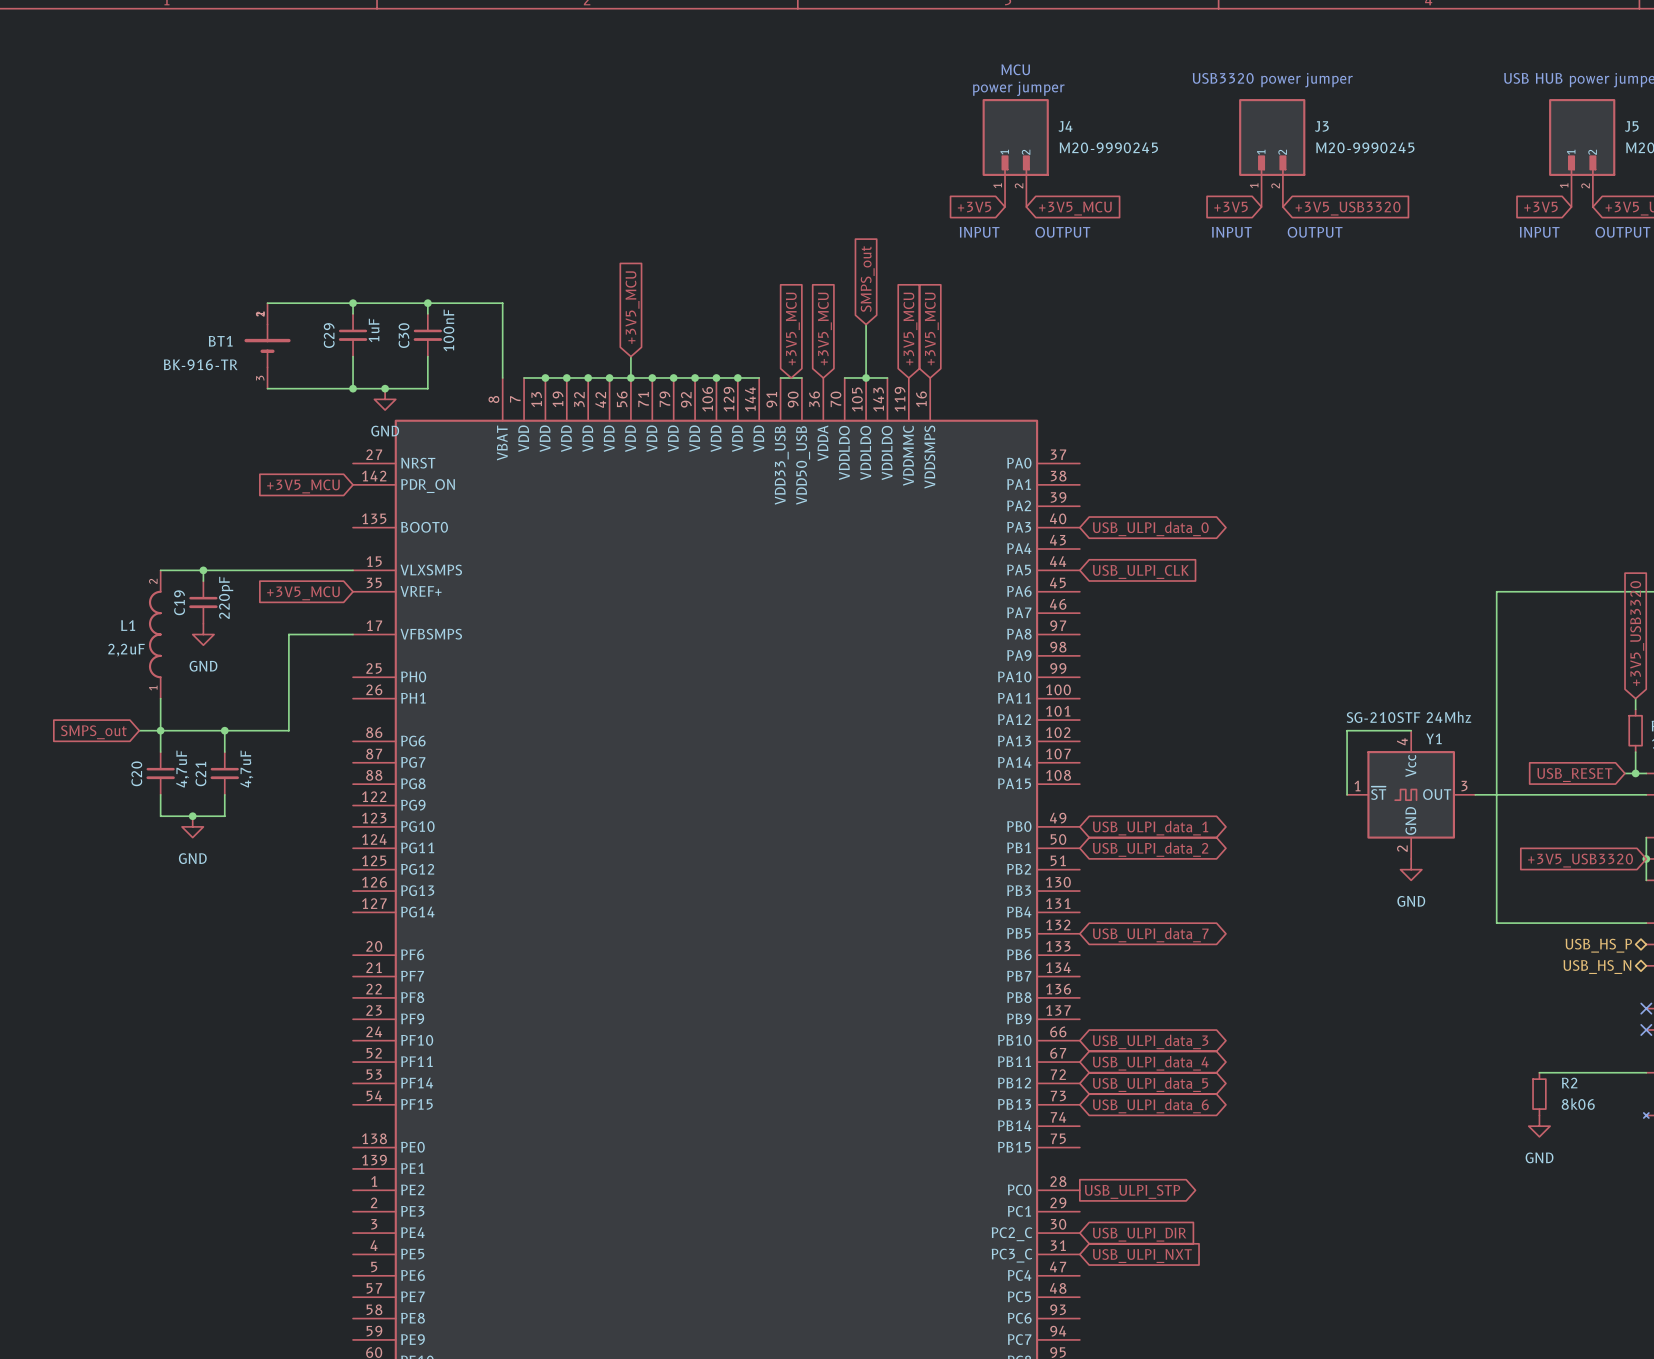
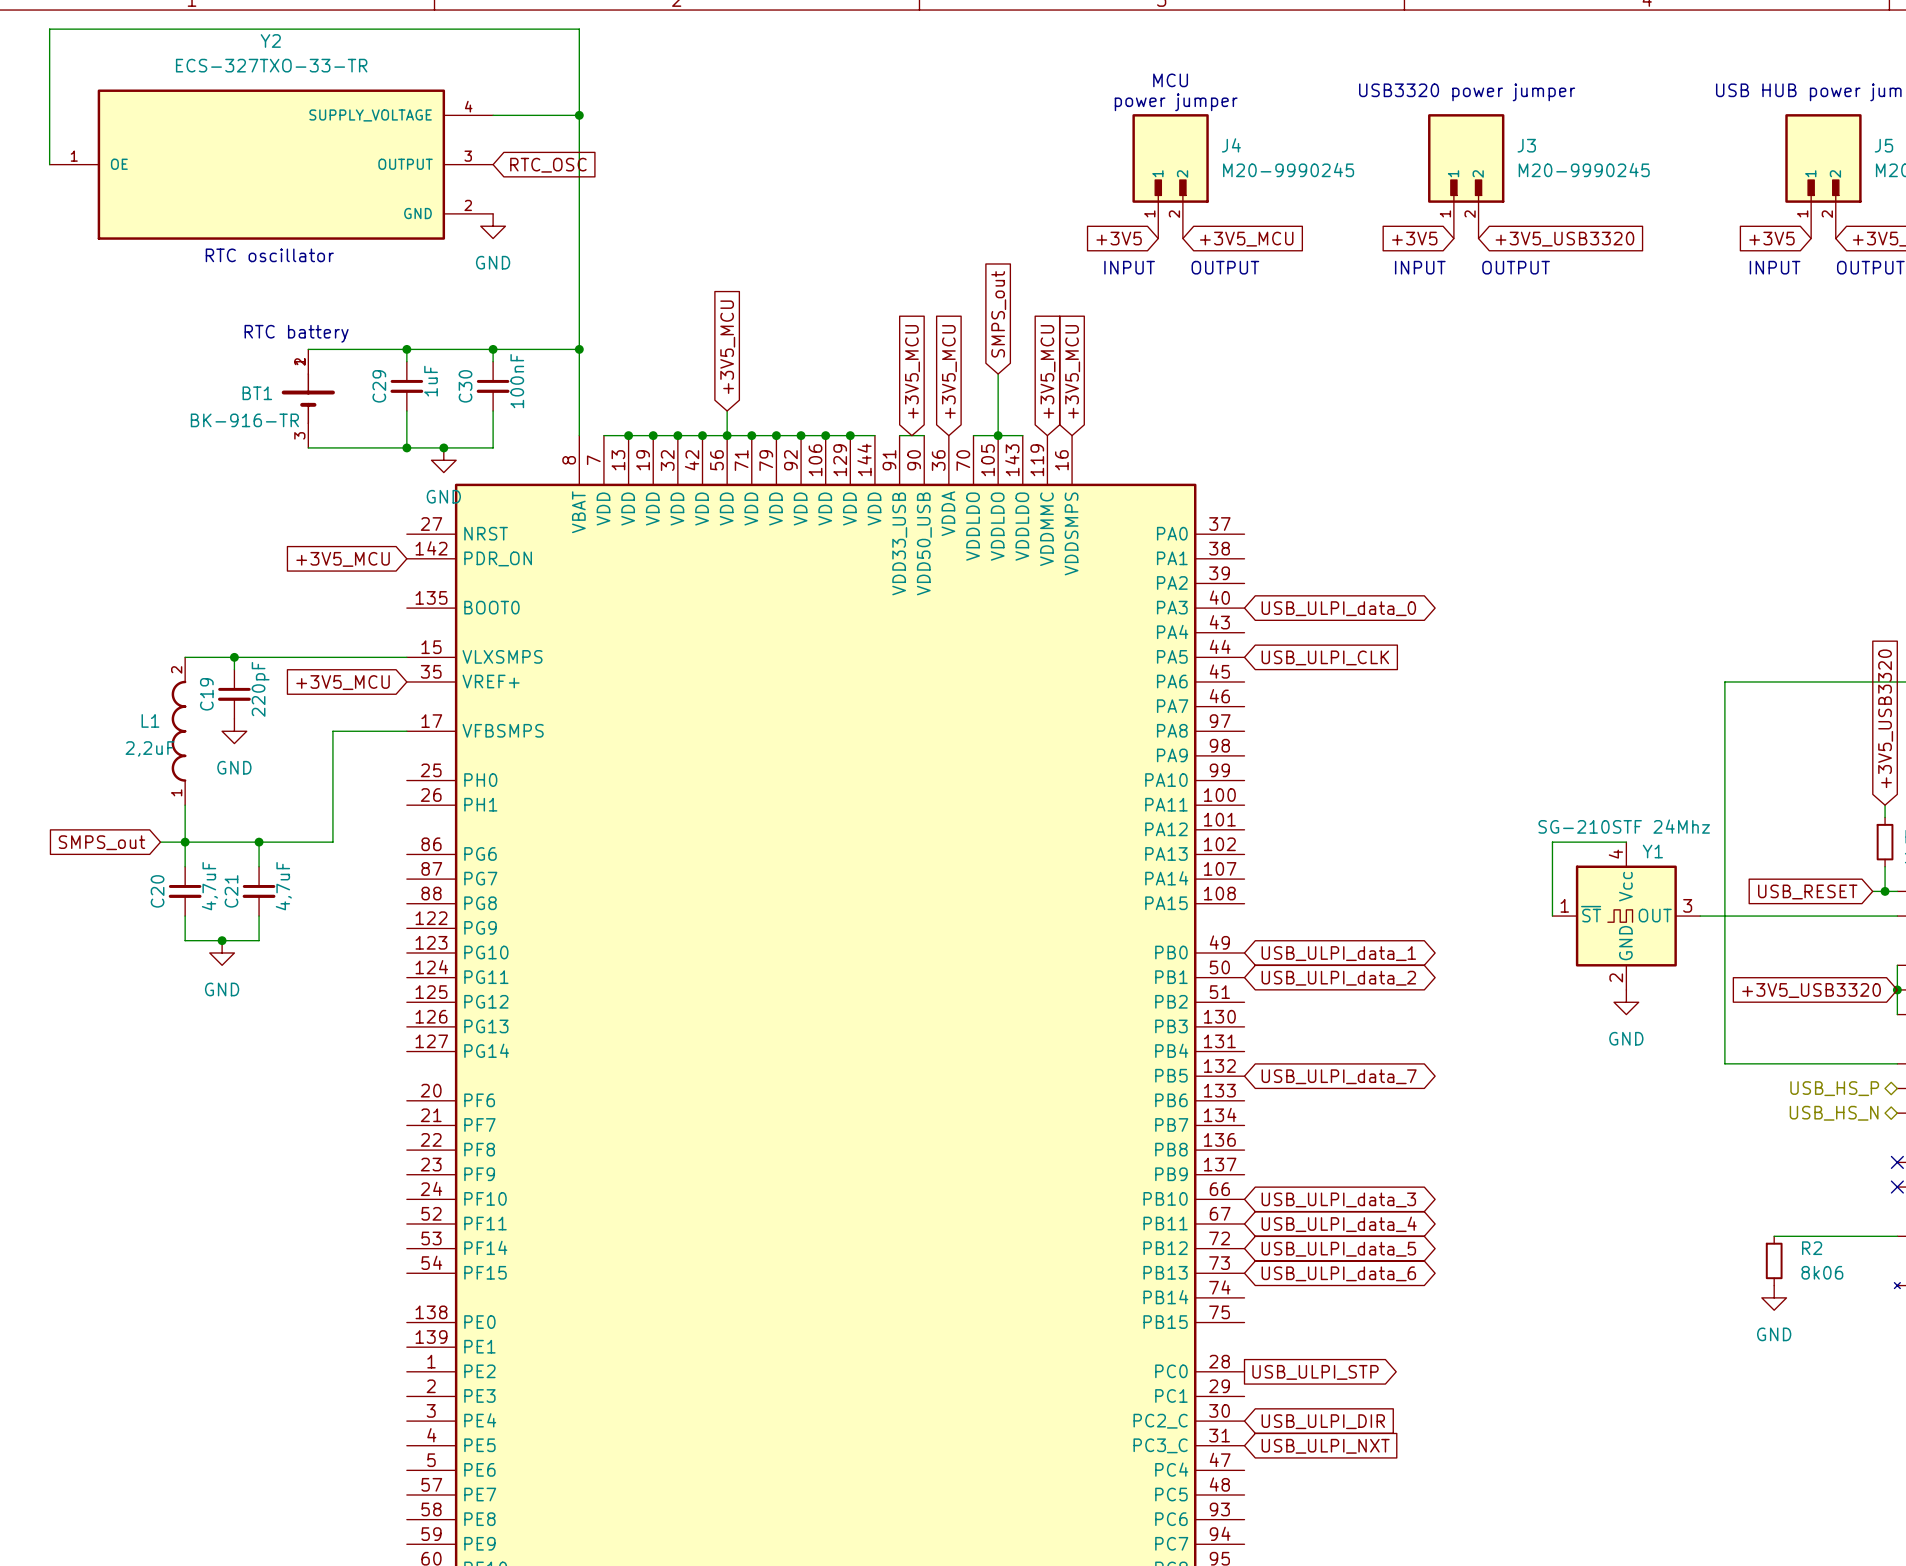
wire: none -> (493, 115) (579, 115)
junction: none -> (579, 115)
wire: none -> (49, 164) (49, 29) (579, 29) (579, 349)
Y2: none -> ECS-327TXO-33-TR (271, 164)
global label: none -> RTC_OSC (548, 165)
power symbol: none -> GND (493, 226)
text: none -> RTC oscillator (269, 255)
text: none -> RTC battery (296, 333)
junction: none -> (579, 349)

